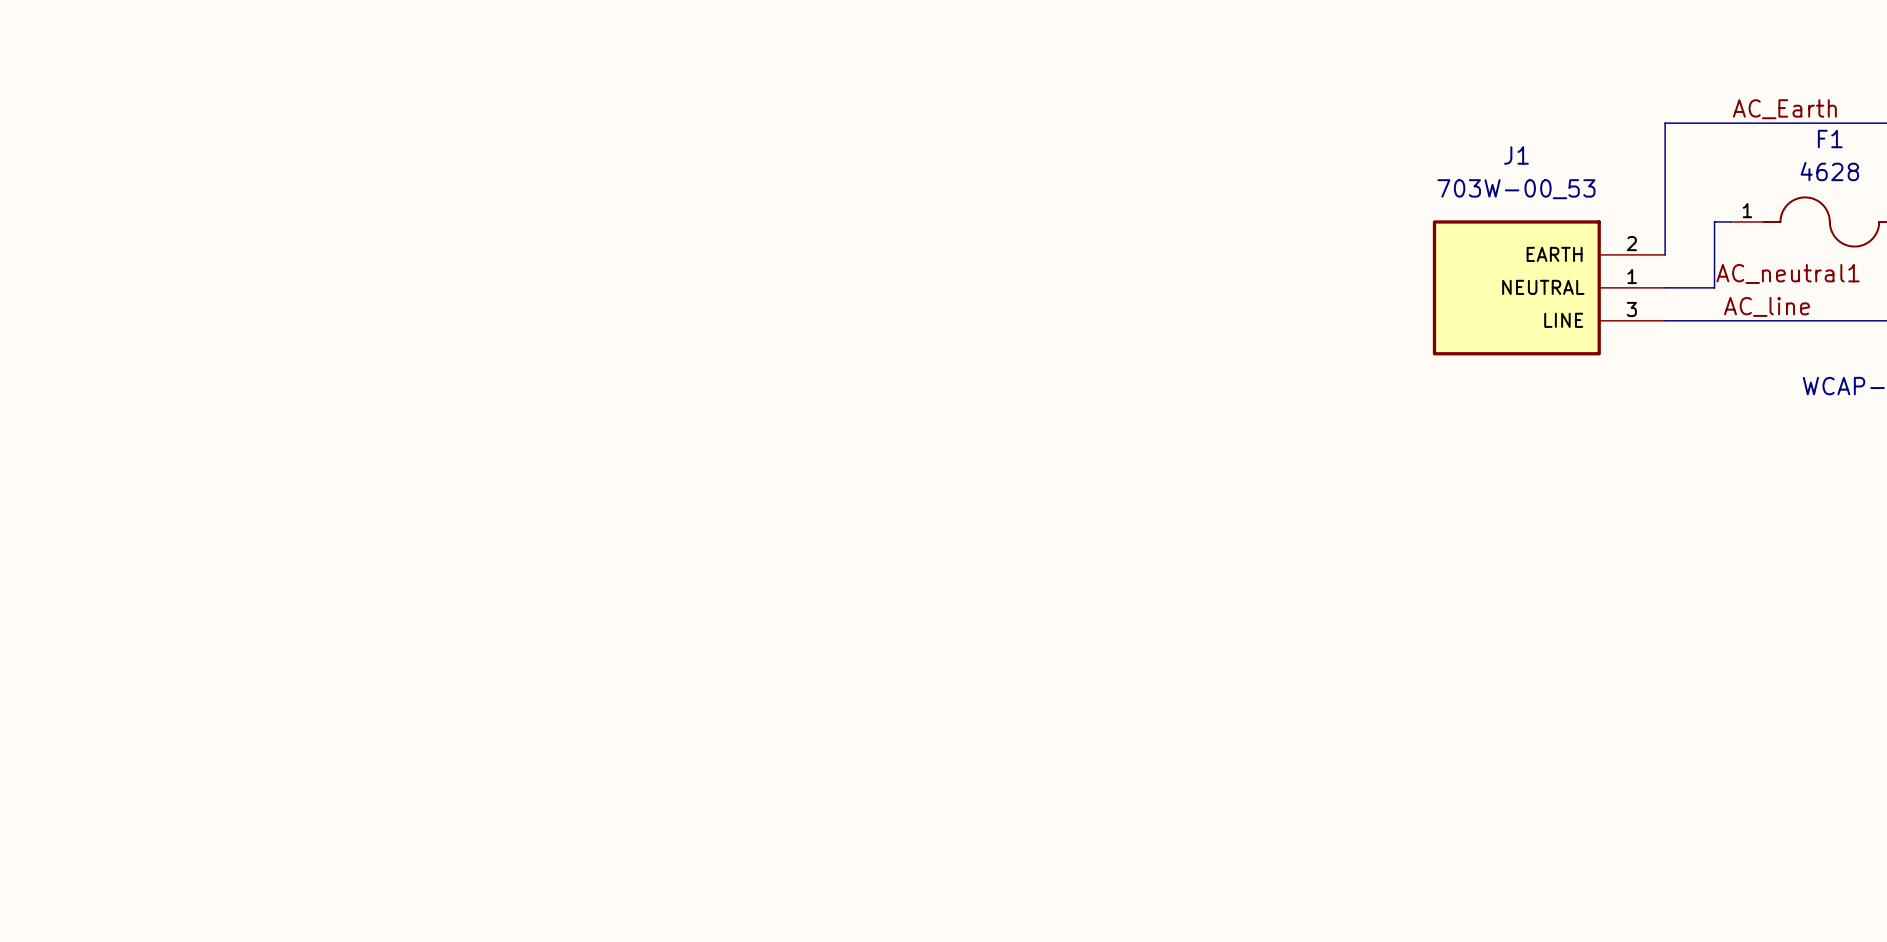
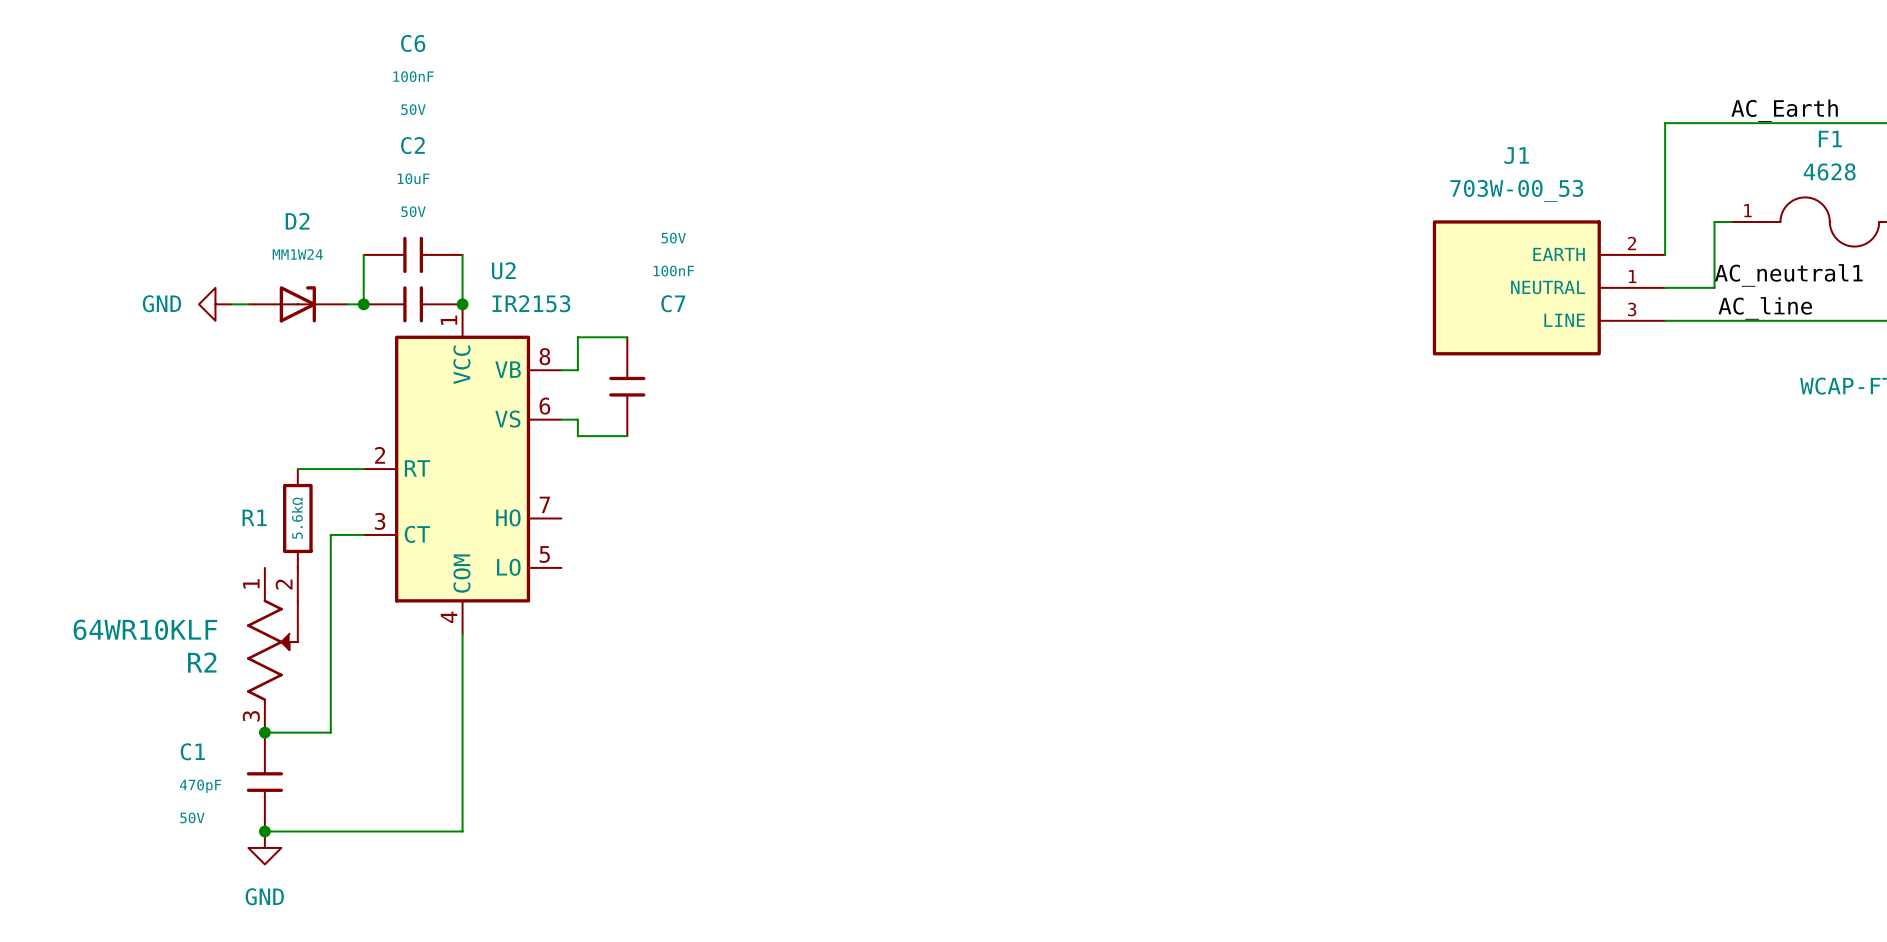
wire: none -> (363, 254) (363, 304) (347, 304)
C6: none -> 100nF (413, 254)
wire: none -> (462, 254) (462, 304)
power symbol: none -> GND (215, 304)
wire: none -> (231, 304) (248, 304)
D2: none -> MM1W24 (297, 304)
junction: none -> (363, 304)
C2: none -> 10uF (413, 304)
junction: none -> (462, 304)
wire: none -> (627, 337) (577, 337) (577, 370) (561, 370)
C7: none -> 100nF (627, 386)
wire: none -> (561, 419) (577, 419) (577, 436) (627, 436)
wire: none -> (297, 469) (363, 469)
U2: none -> IR2153 (462, 469)
R1: none -> 5.6kΩ (297, 518)
wire: none -> (363, 534) (330, 534) (330, 732) (264, 732)
wire: none -> (462, 633) (462, 831) (264, 831)
R2: none -> 64WR10KLF (272, 650)
junction: none -> (264, 732)
C1: none -> 470pF (264, 782)
junction: none -> (264, 831)
power symbol: none -> GND (264, 847)

